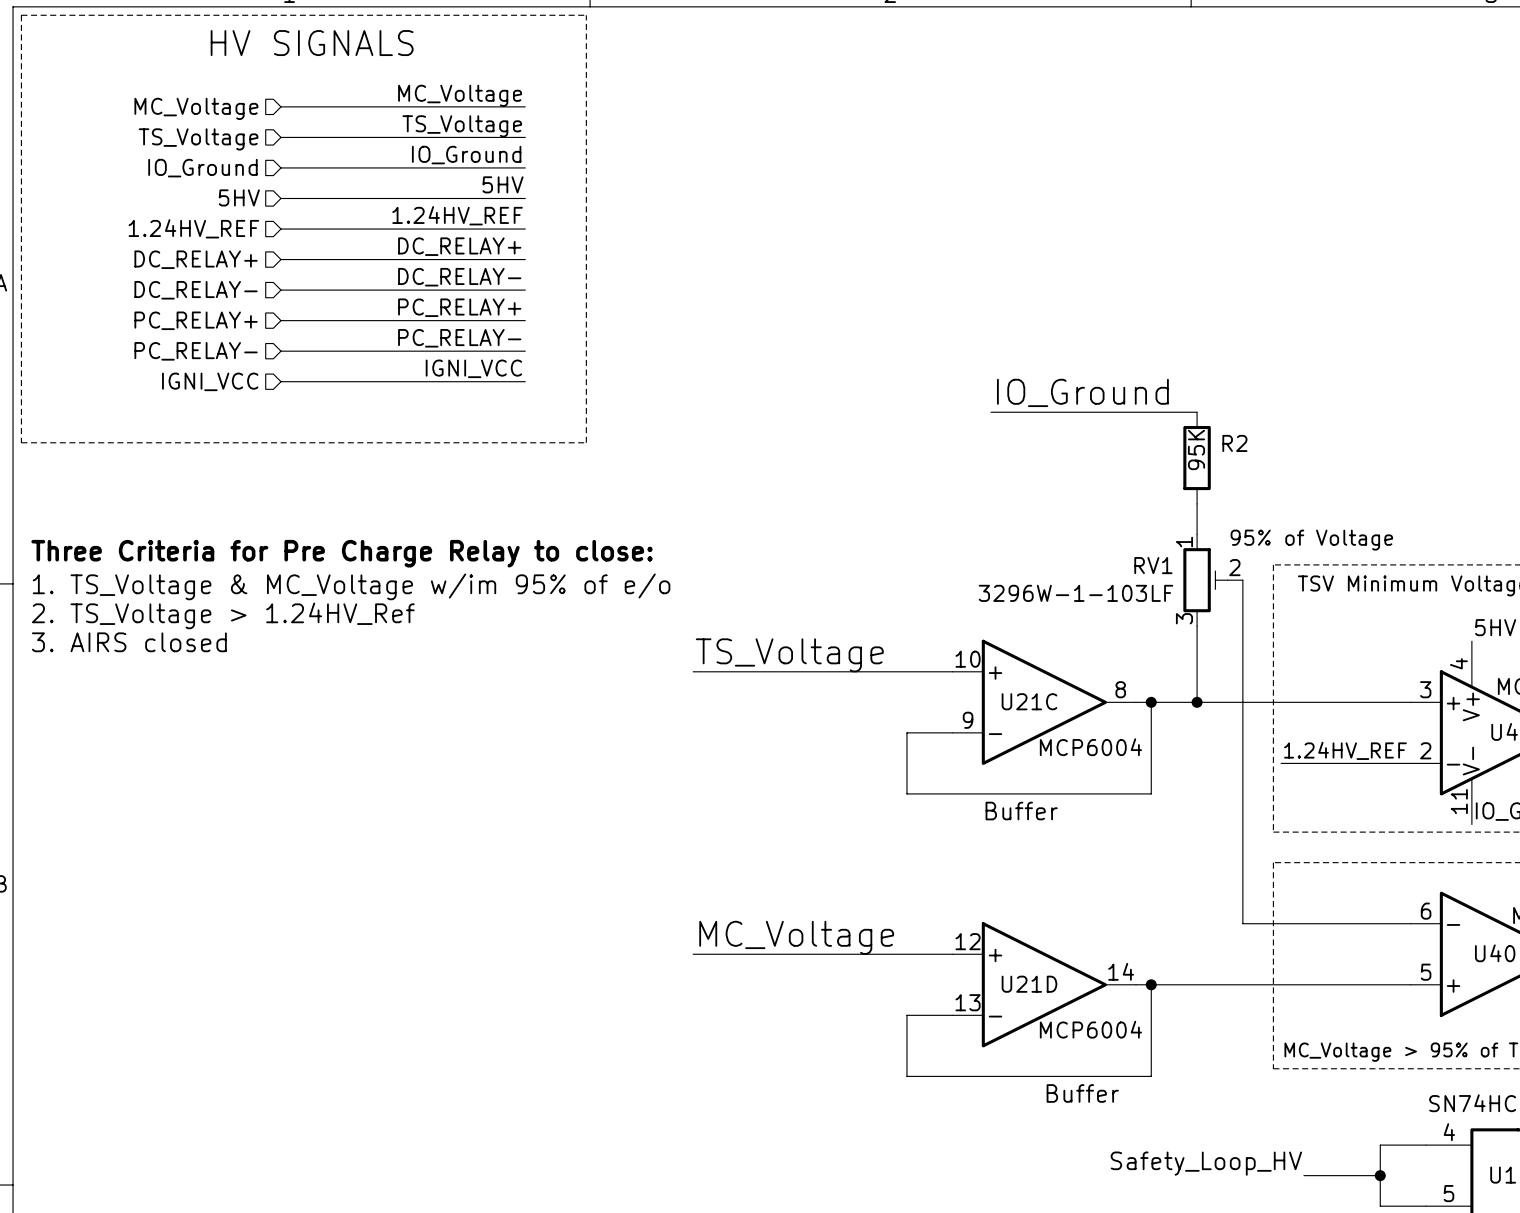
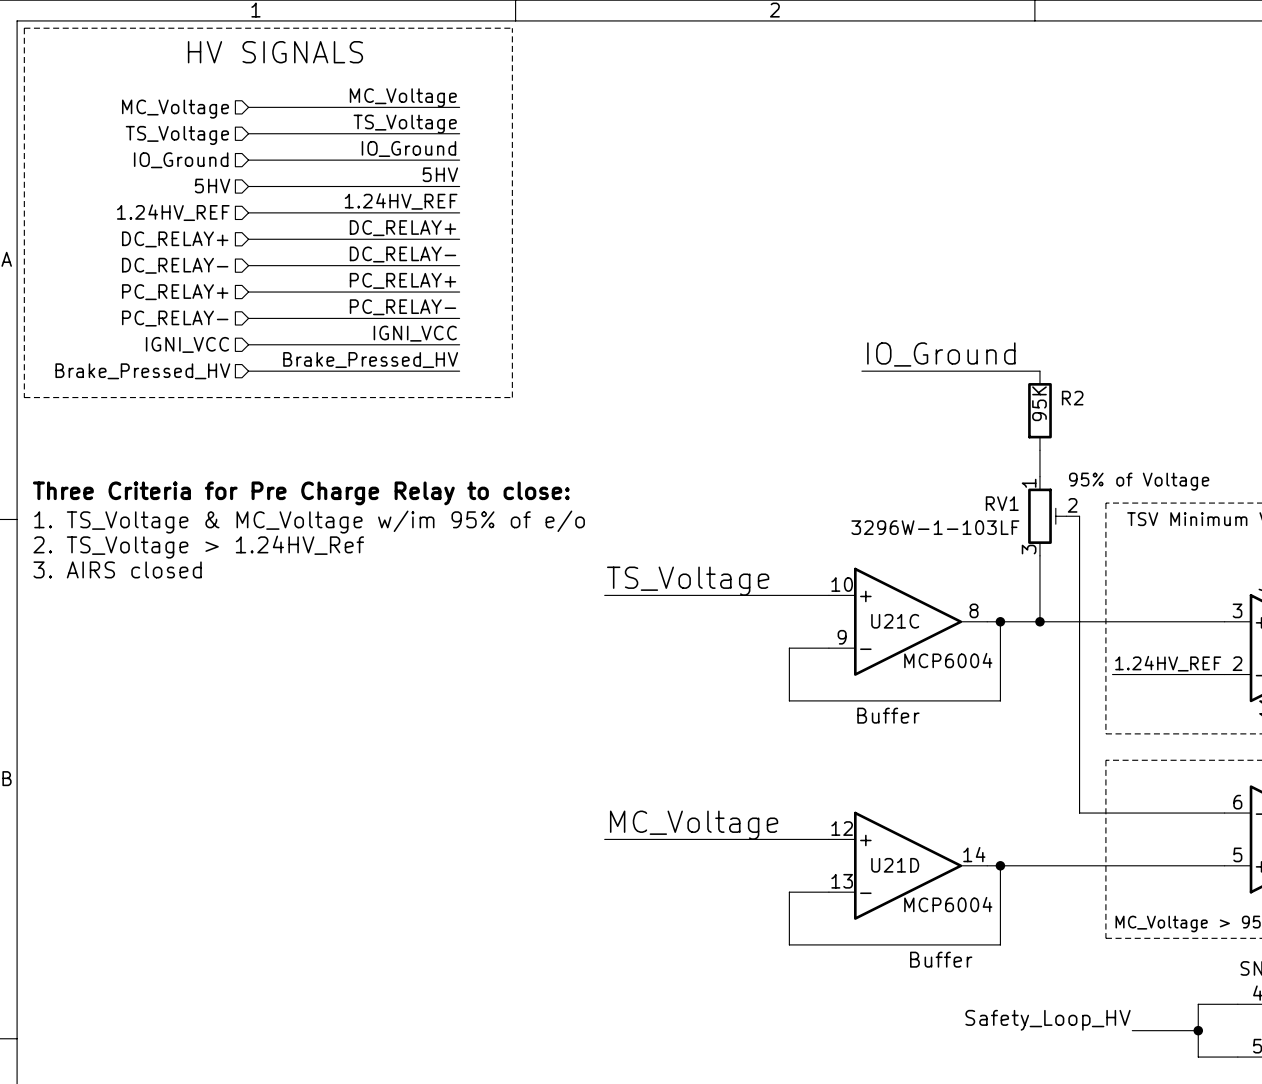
label: none -> Brake_Pressed_HV (370, 360)
hierarchical label: none -> Brake_Pressed_HV (142, 371)
wire: none -> (248, 371) (459, 371)

